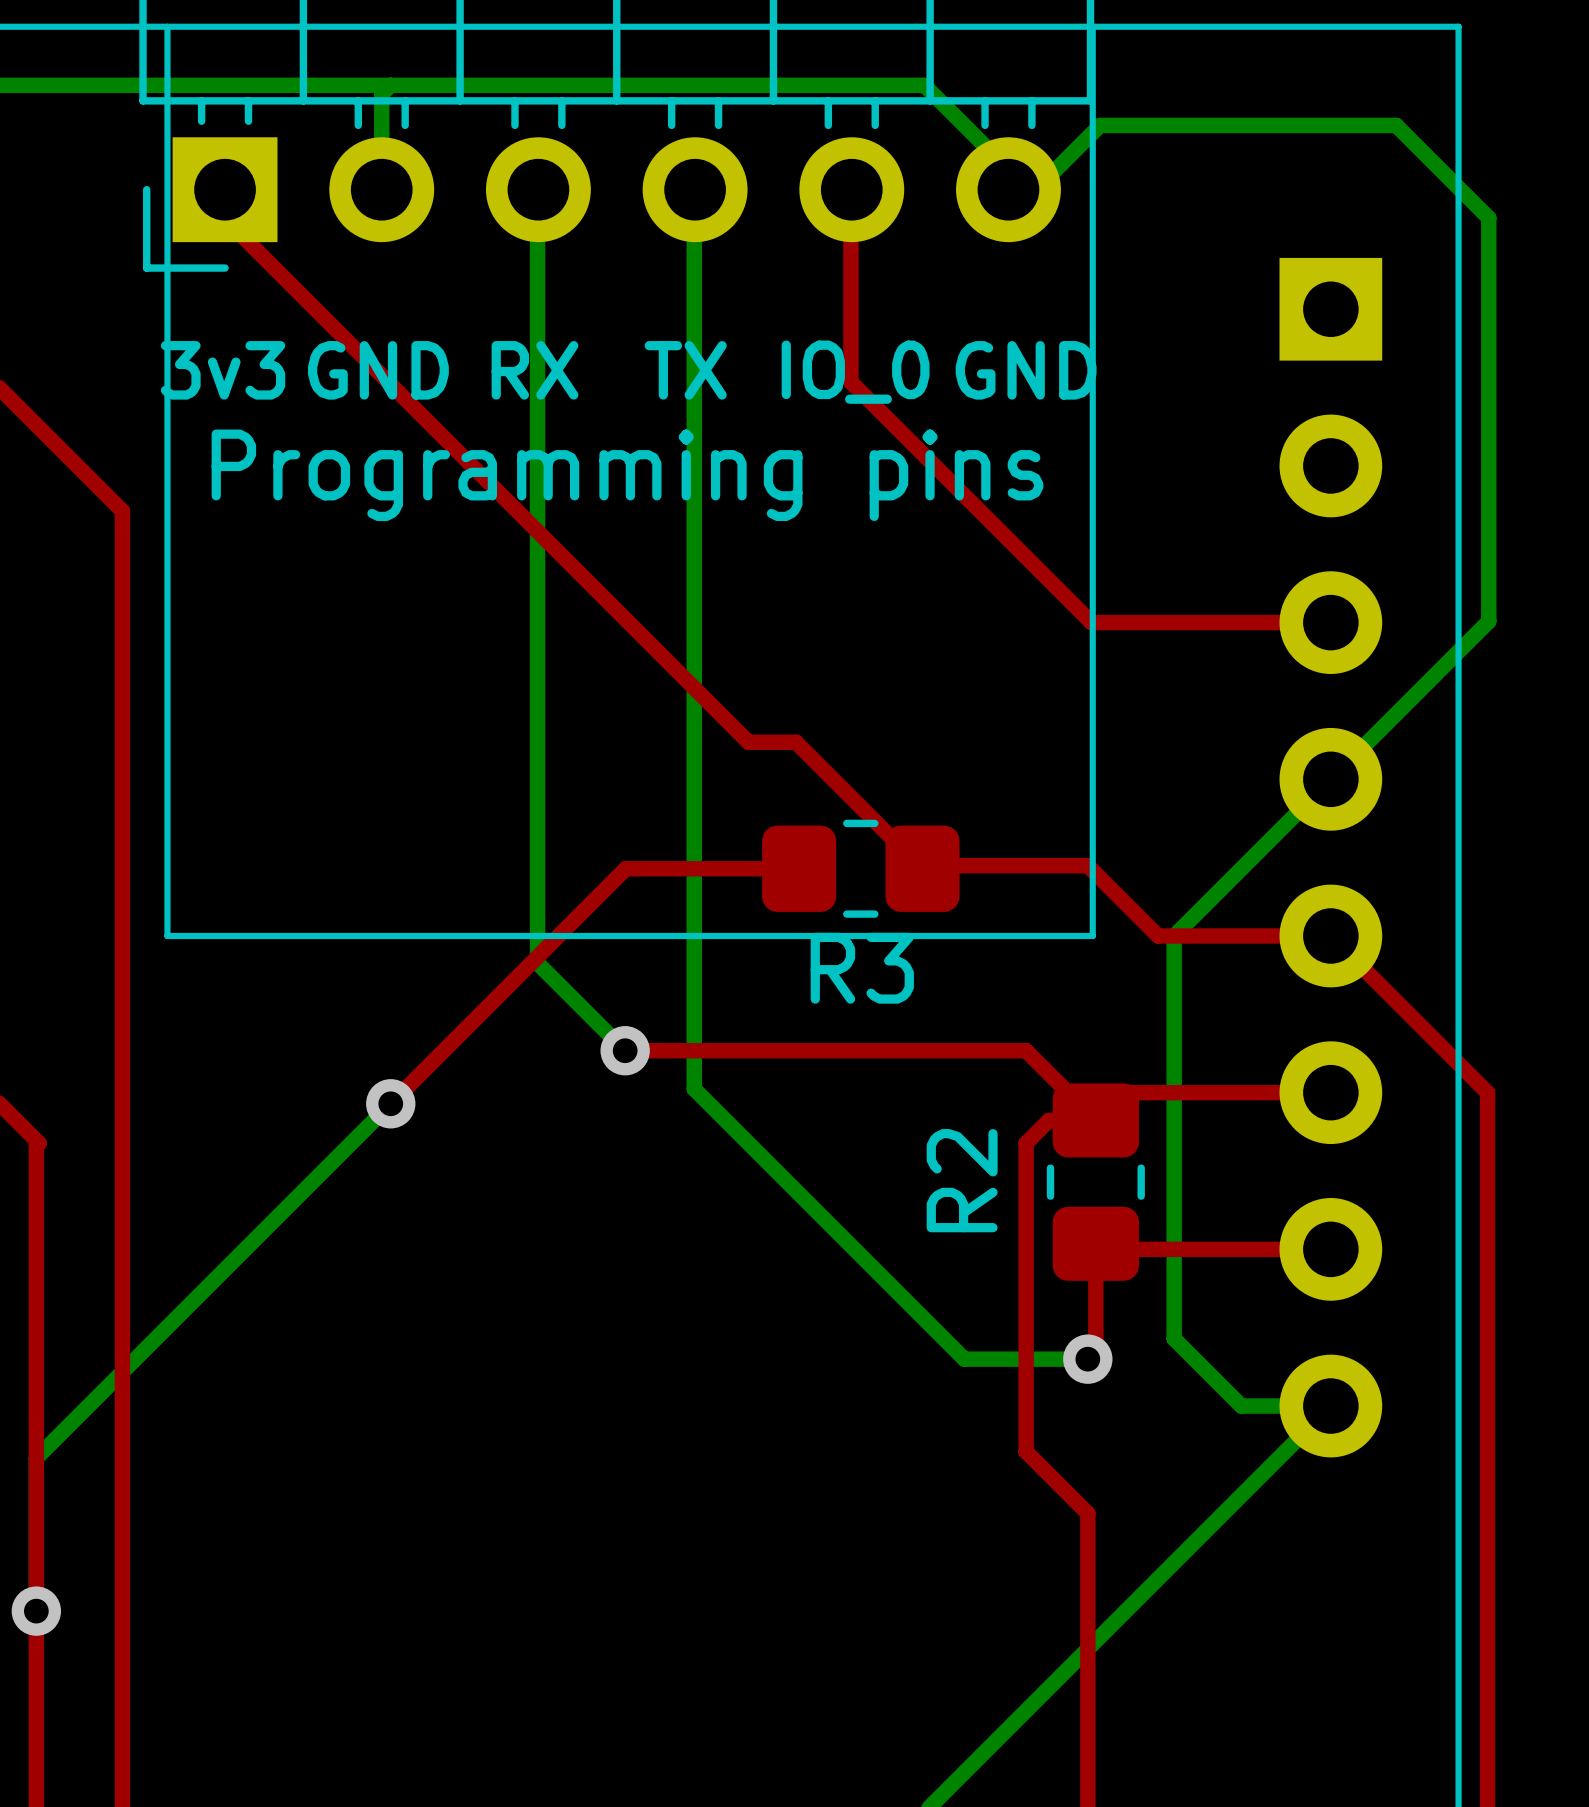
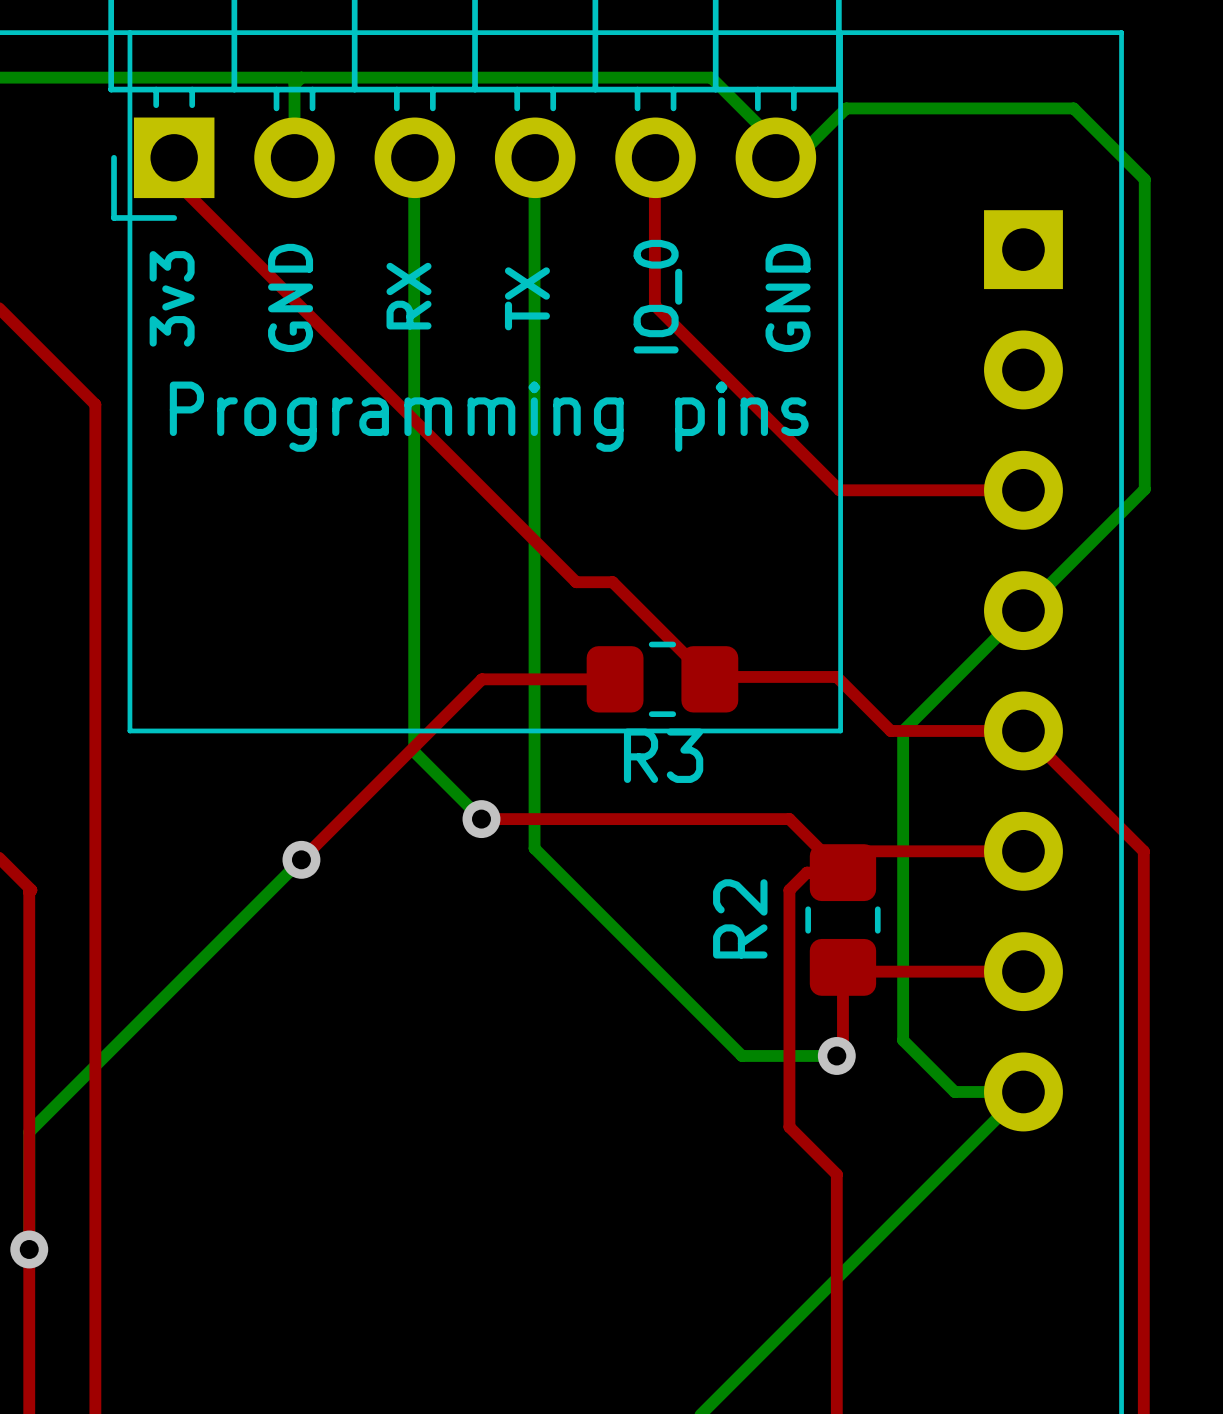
text rotation: 0° (223, 370) -> 90° counterclockwise (172, 298)
text rotation: 0° (378, 370) -> 90° counterclockwise (290, 297)
text rotation: 0° (534, 370) -> 90° counterclockwise (409, 296)
text rotation: 0° (685, 370) -> 90° counterclockwise (527, 298)
text rotation: 0° (1026, 370) -> 90° counterclockwise (788, 297)
text rotation: 0° (855, 372) -> 90° counterclockwise (657, 296)
part value position: Programming pins (627, 475) -> Programming pins (489, 416)

